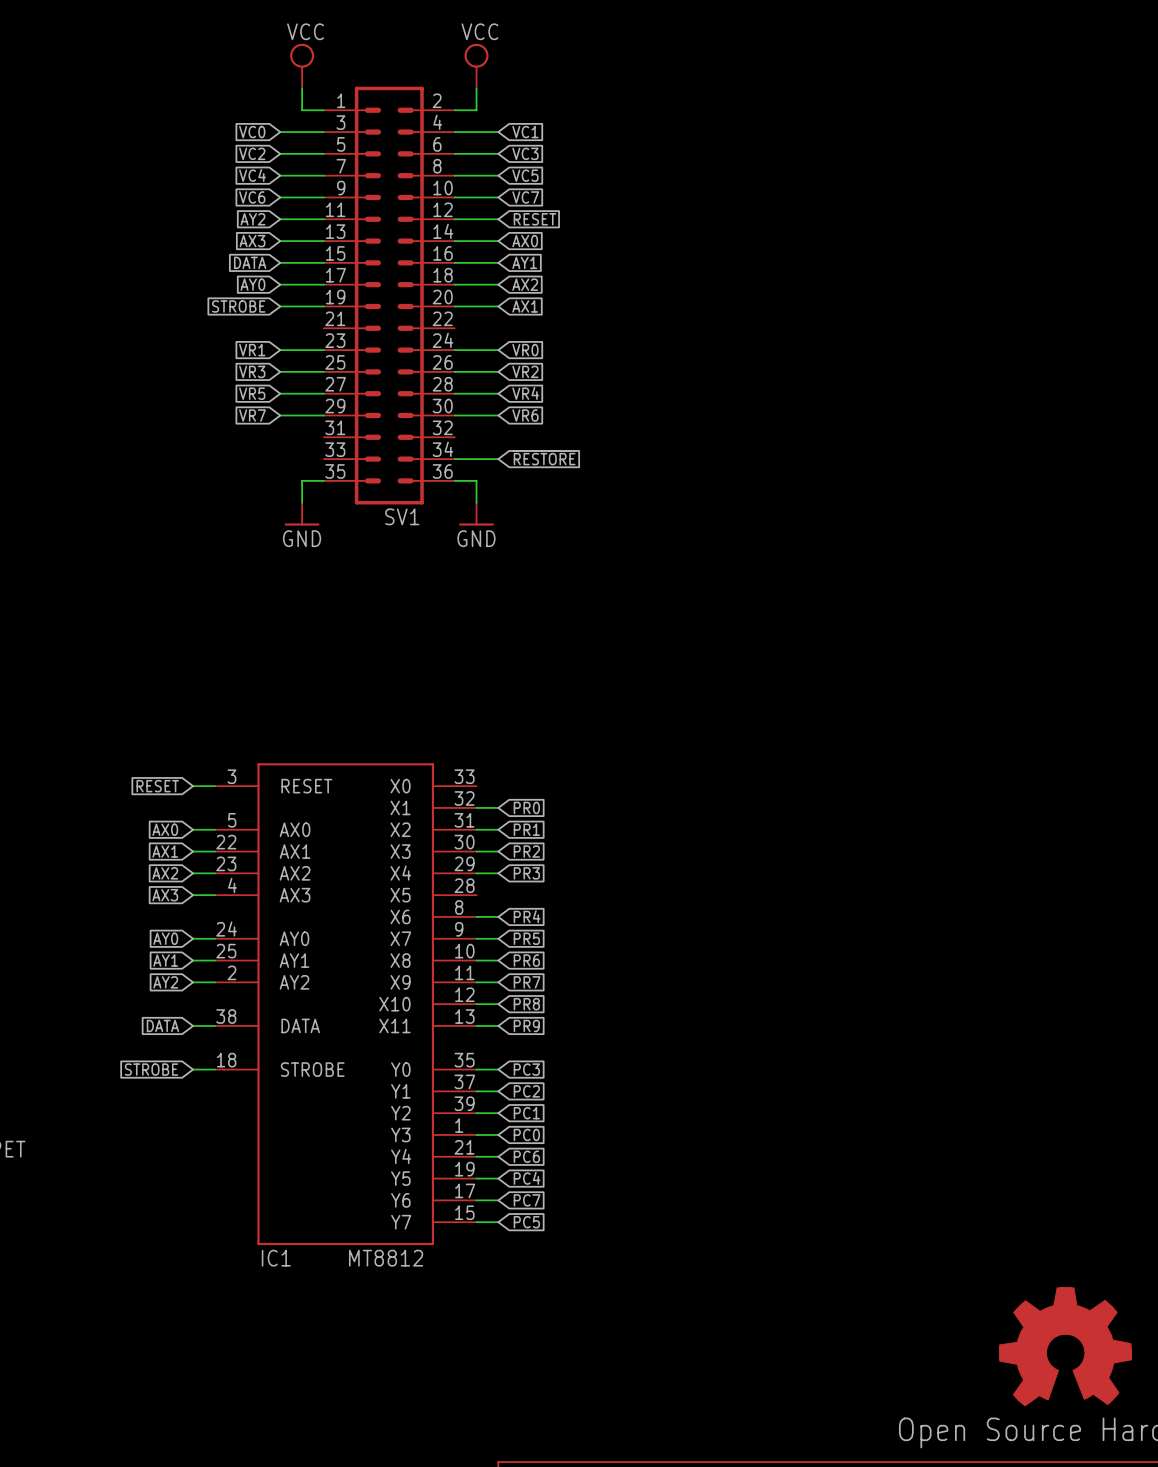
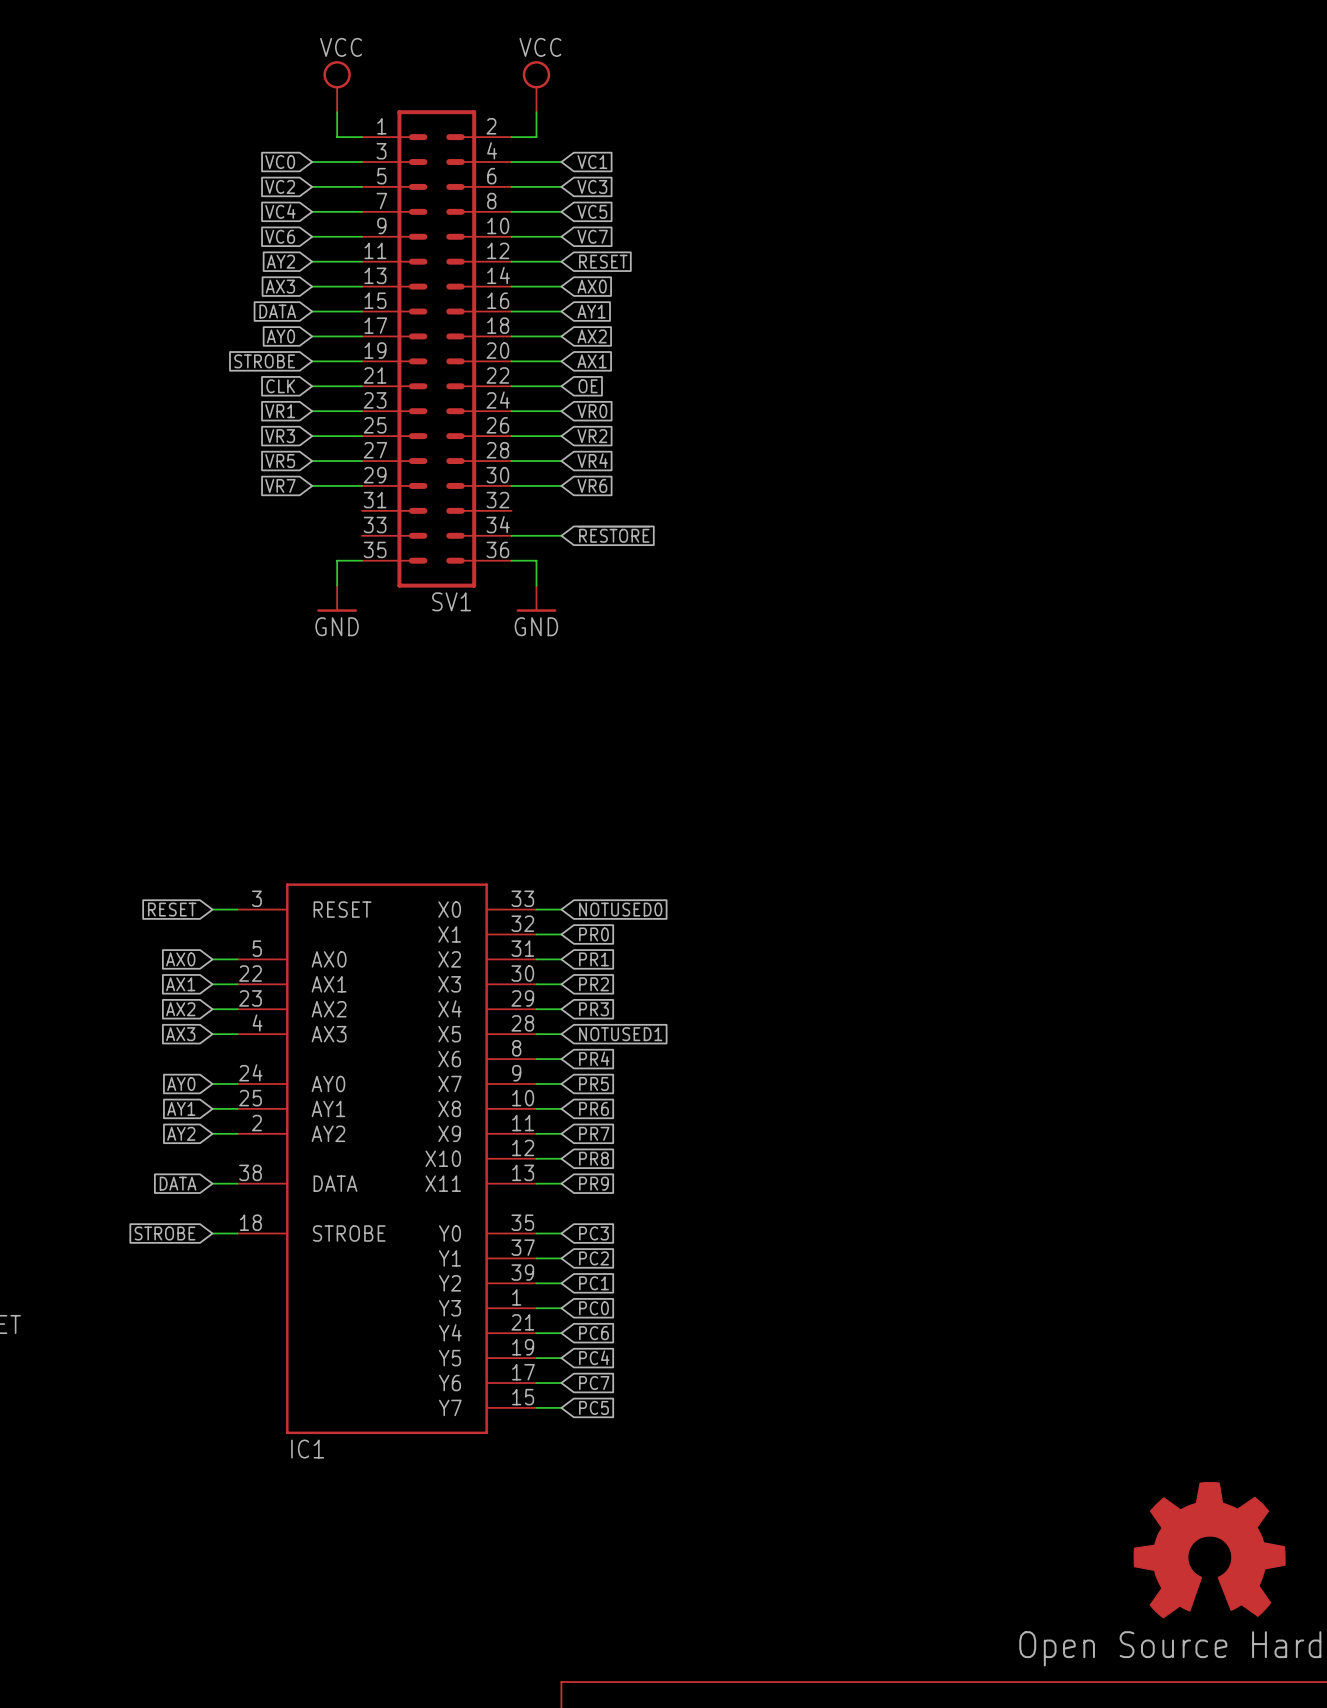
global label: none -> CLK (280, 386)
wire: none -> (312, 386) (362, 386)
wire: none -> (511, 386) (561, 386)
global label: none -> OE (588, 386)
wire: none -> (536, 909) (561, 909)
global label: none -> NOTUSED0 (620, 909)
wire: none -> (536, 1034) (561, 1034)
global label: none -> NOTUSED1 (620, 1034)
IC1 value: MT8812 (386, 1258) -> none

